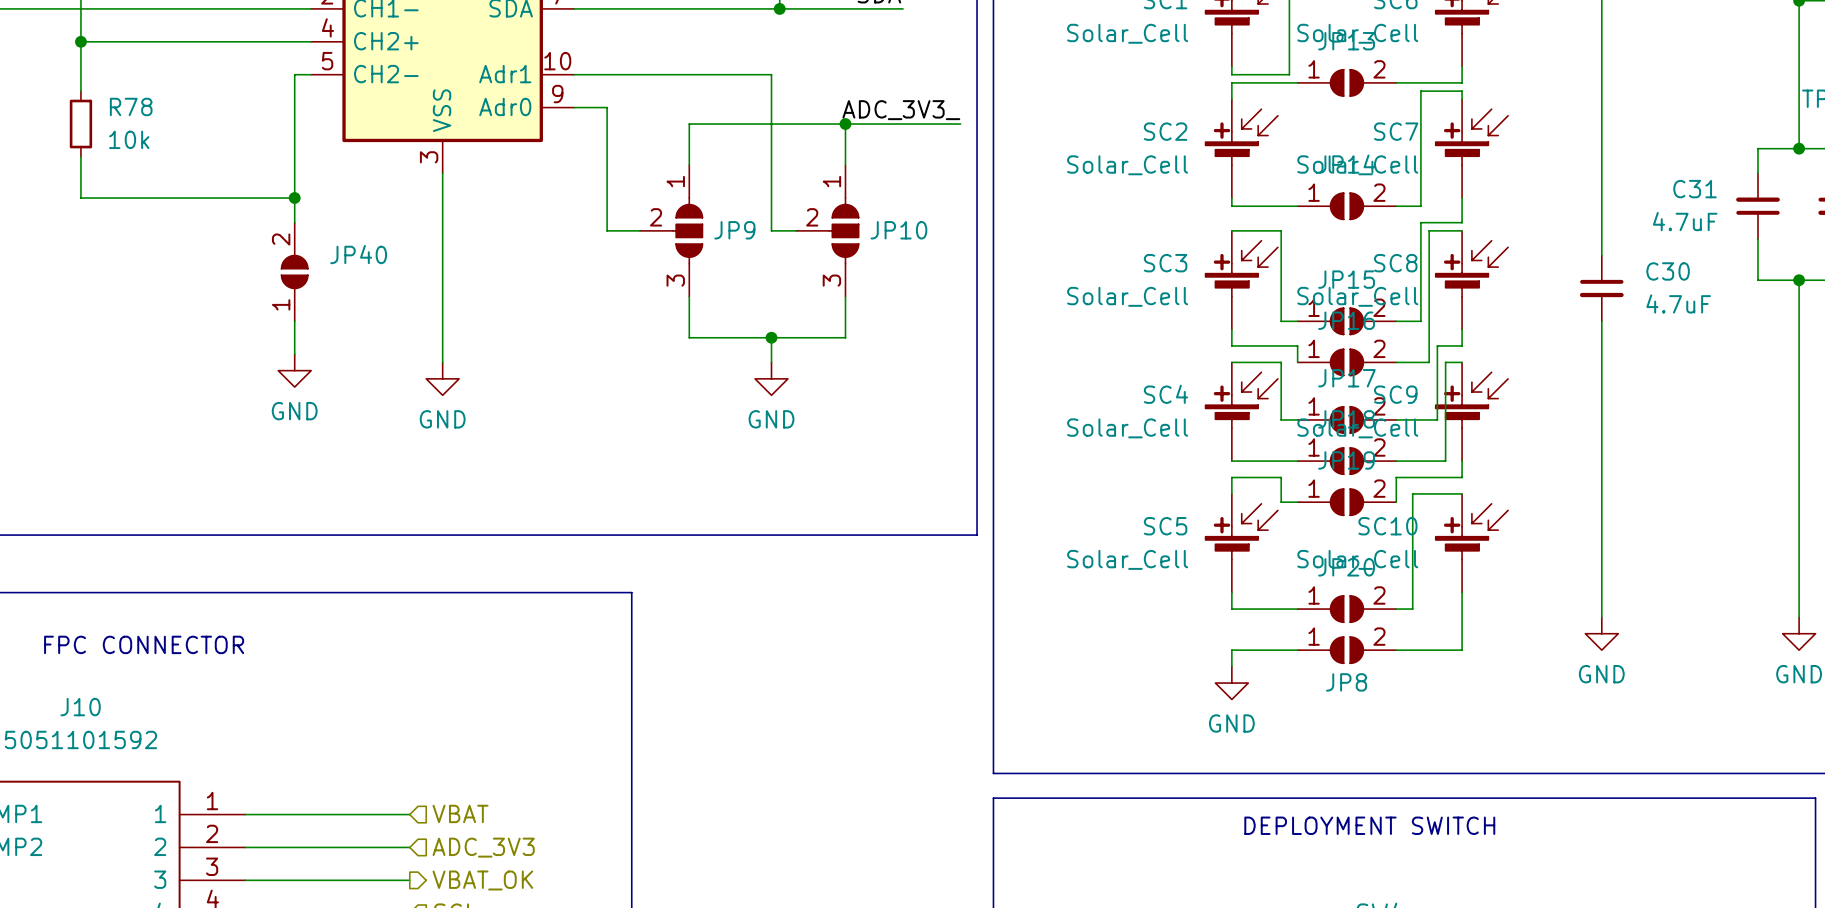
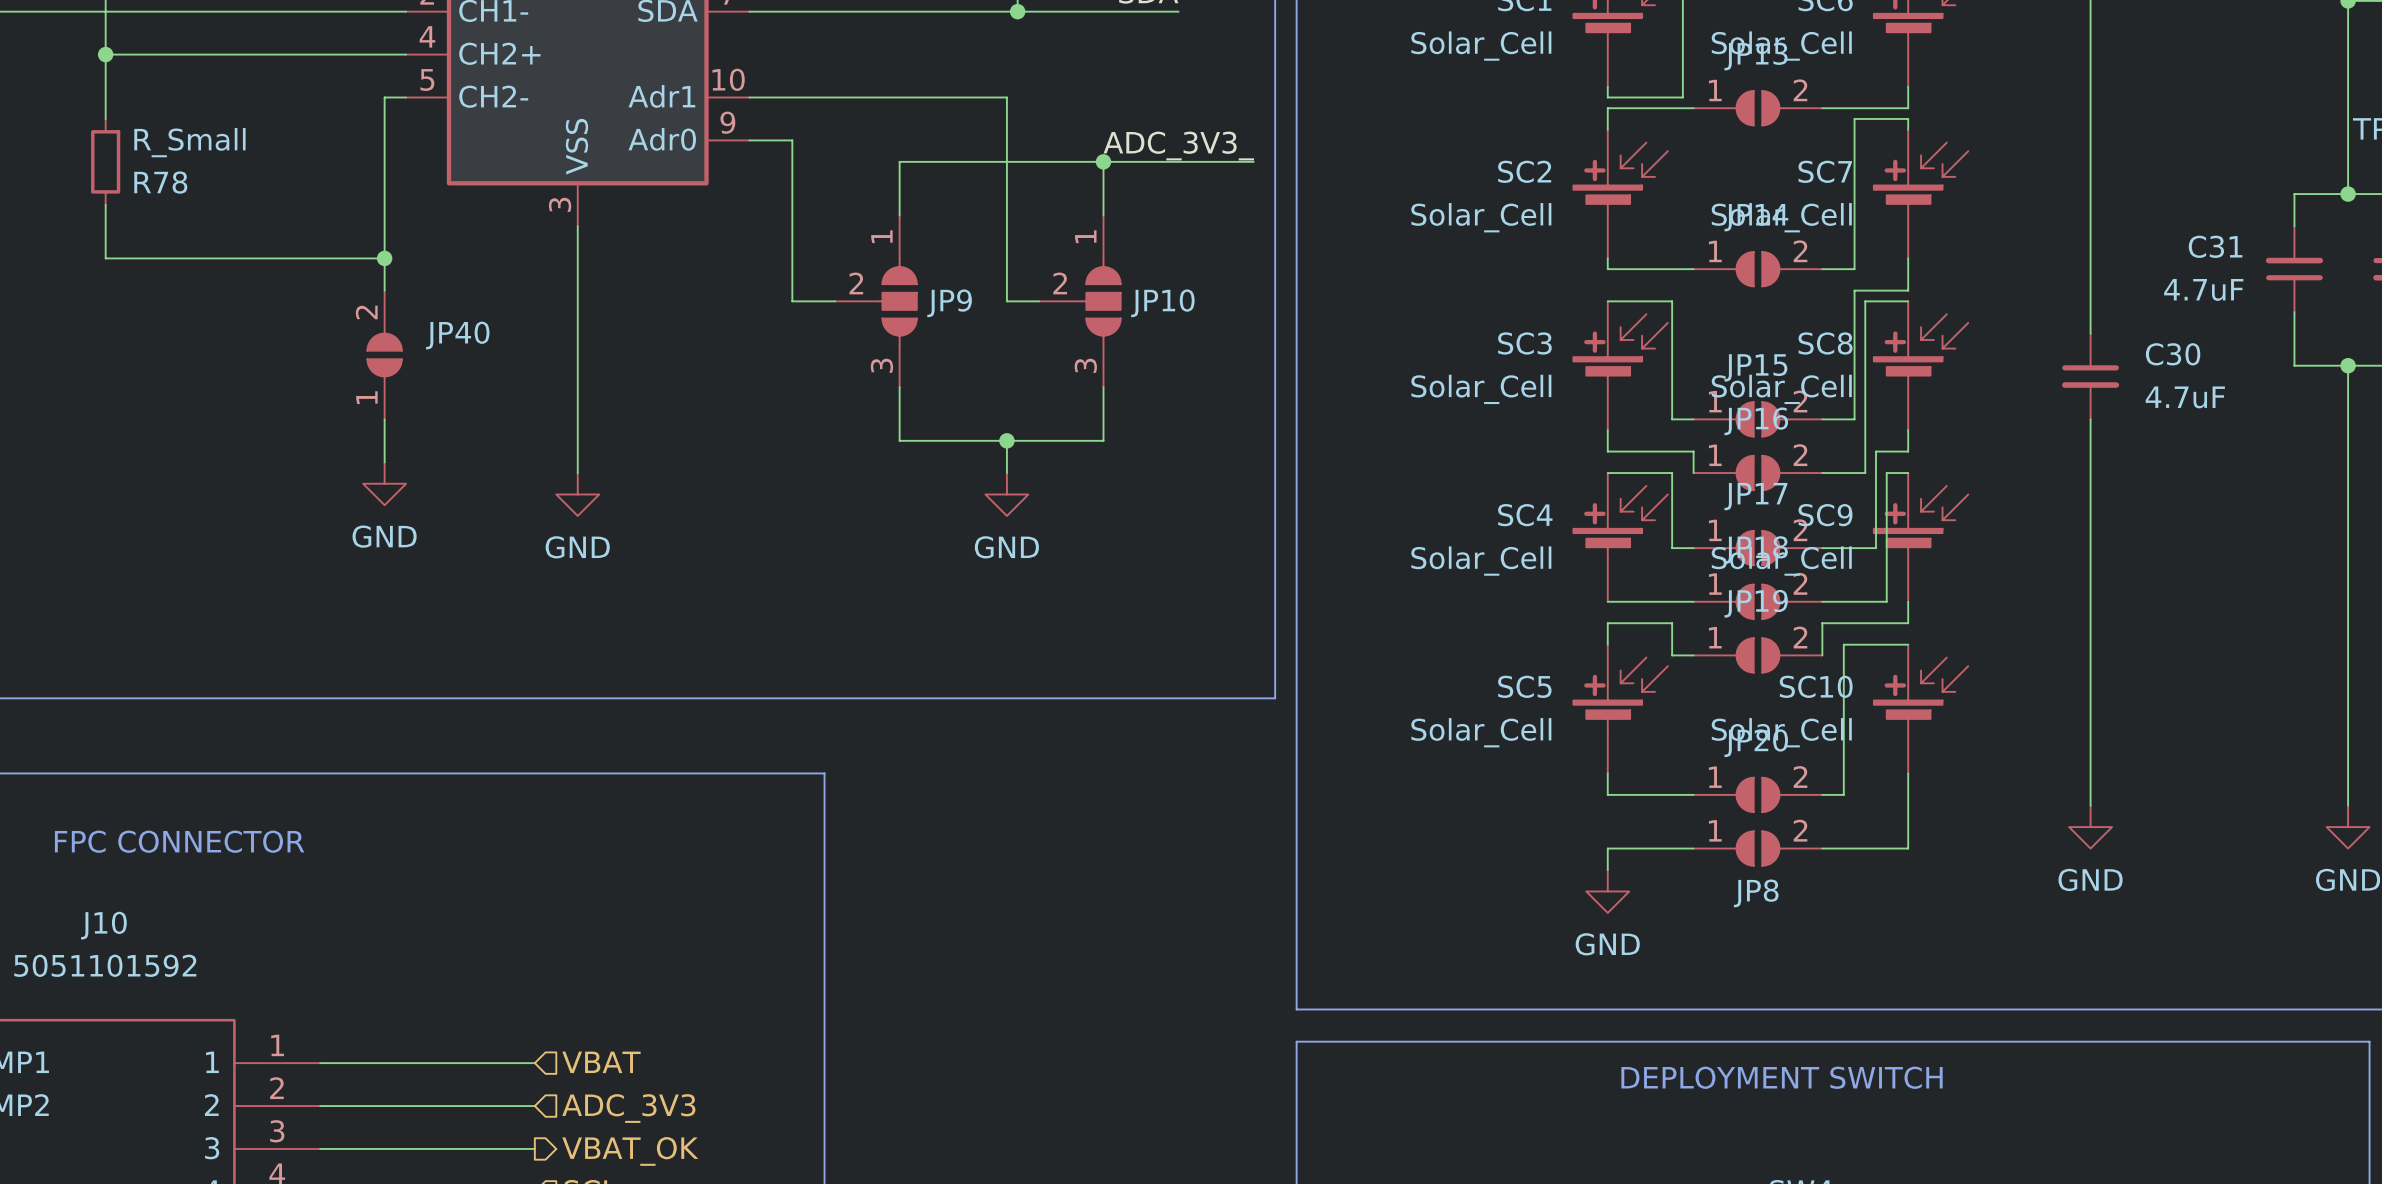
R78 name position: R78 (131, 106) -> R78 (160, 182)
R78 value: 10k (129, 139) -> R_Small (189, 142)

